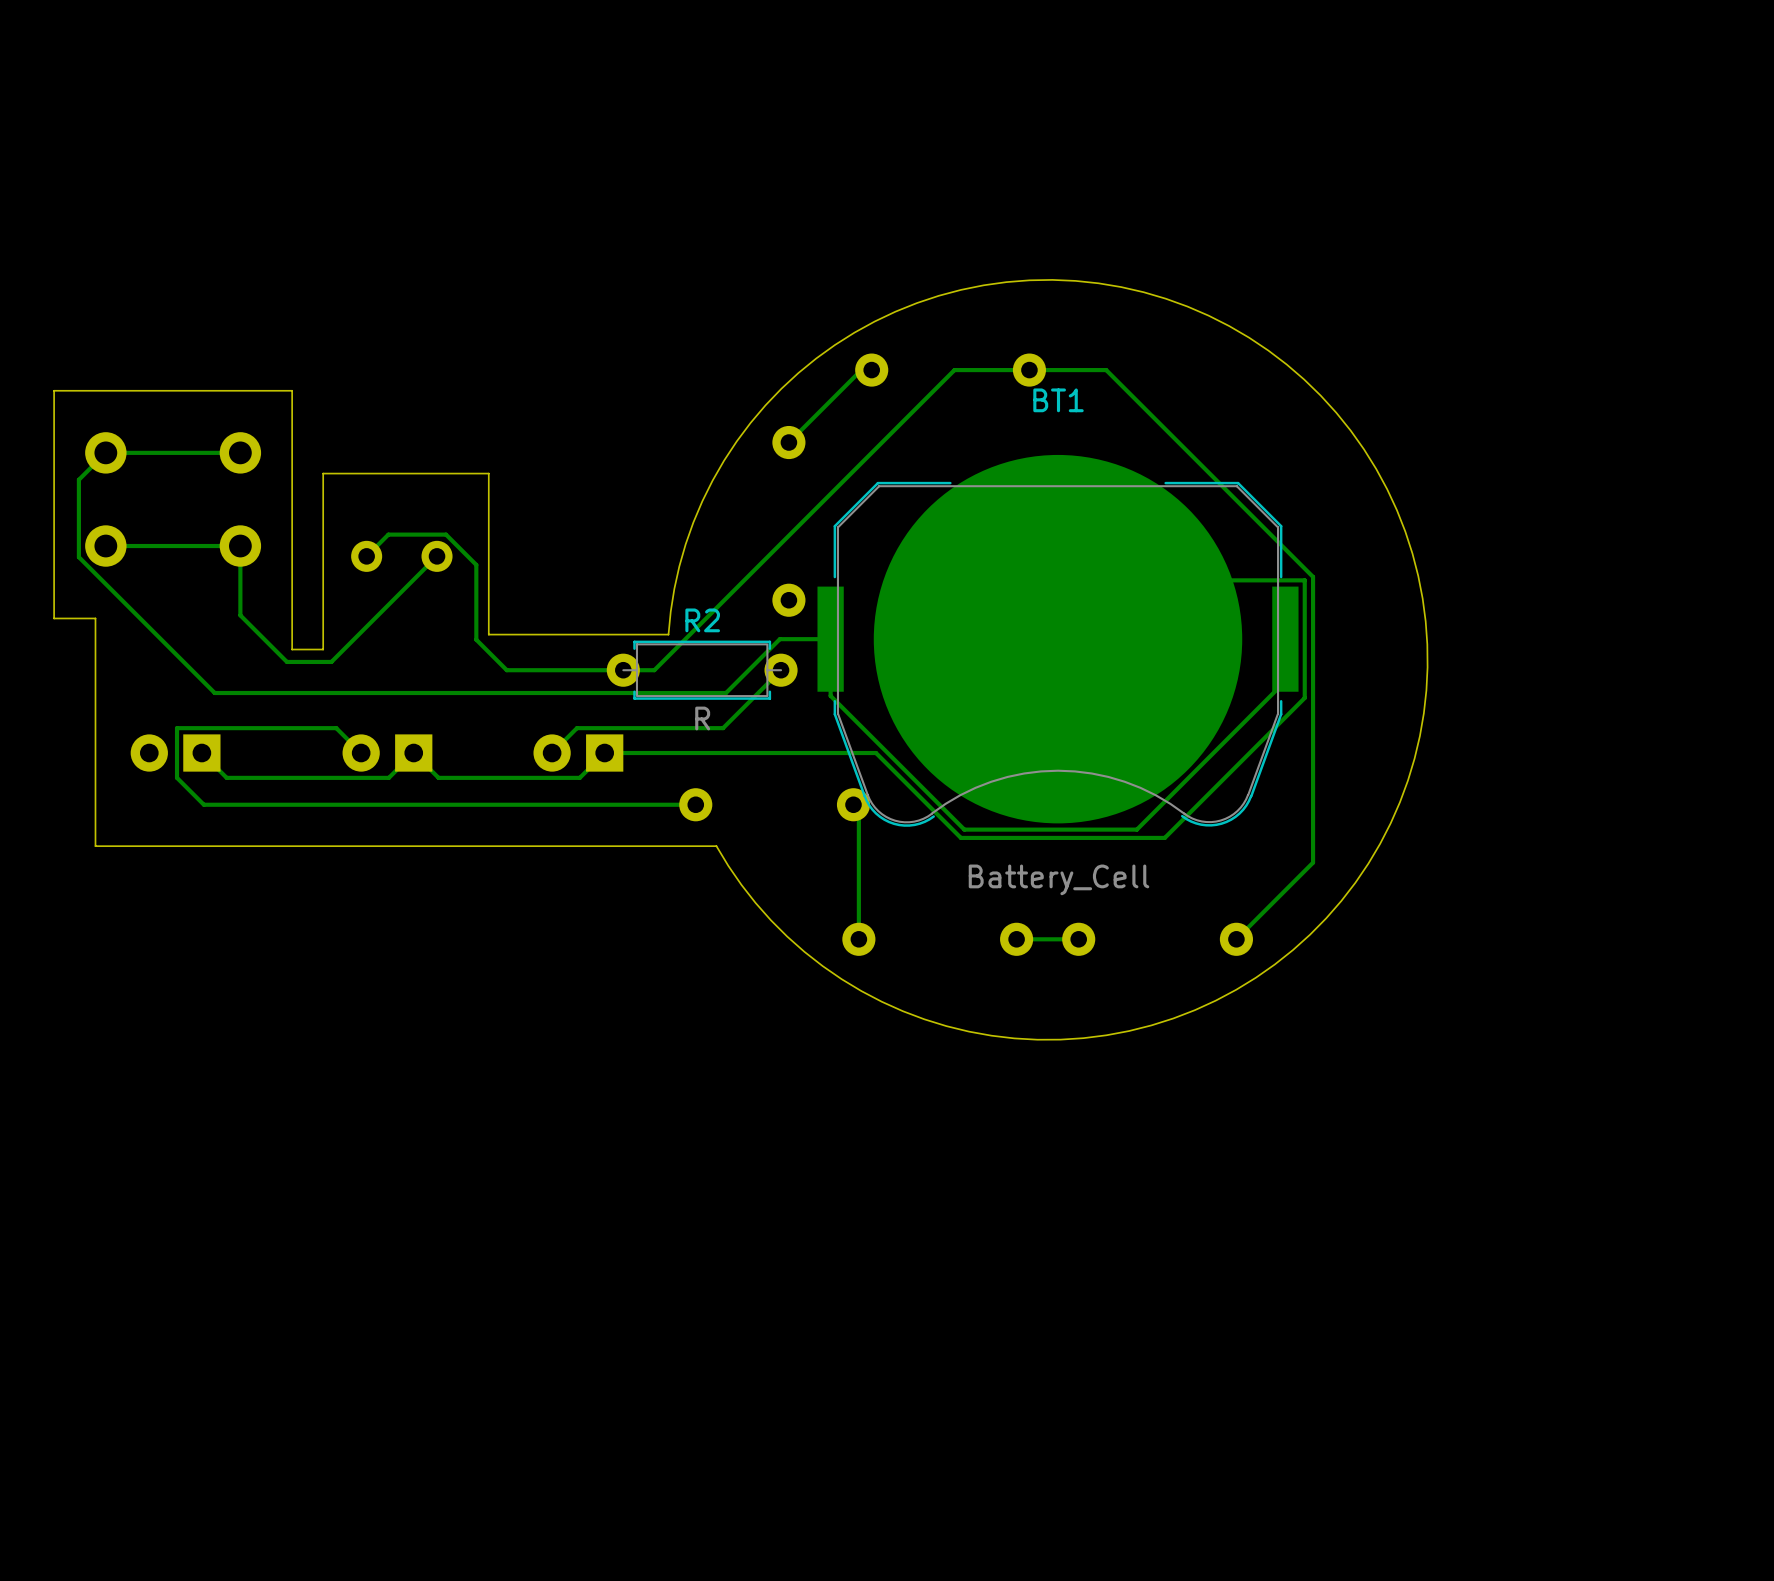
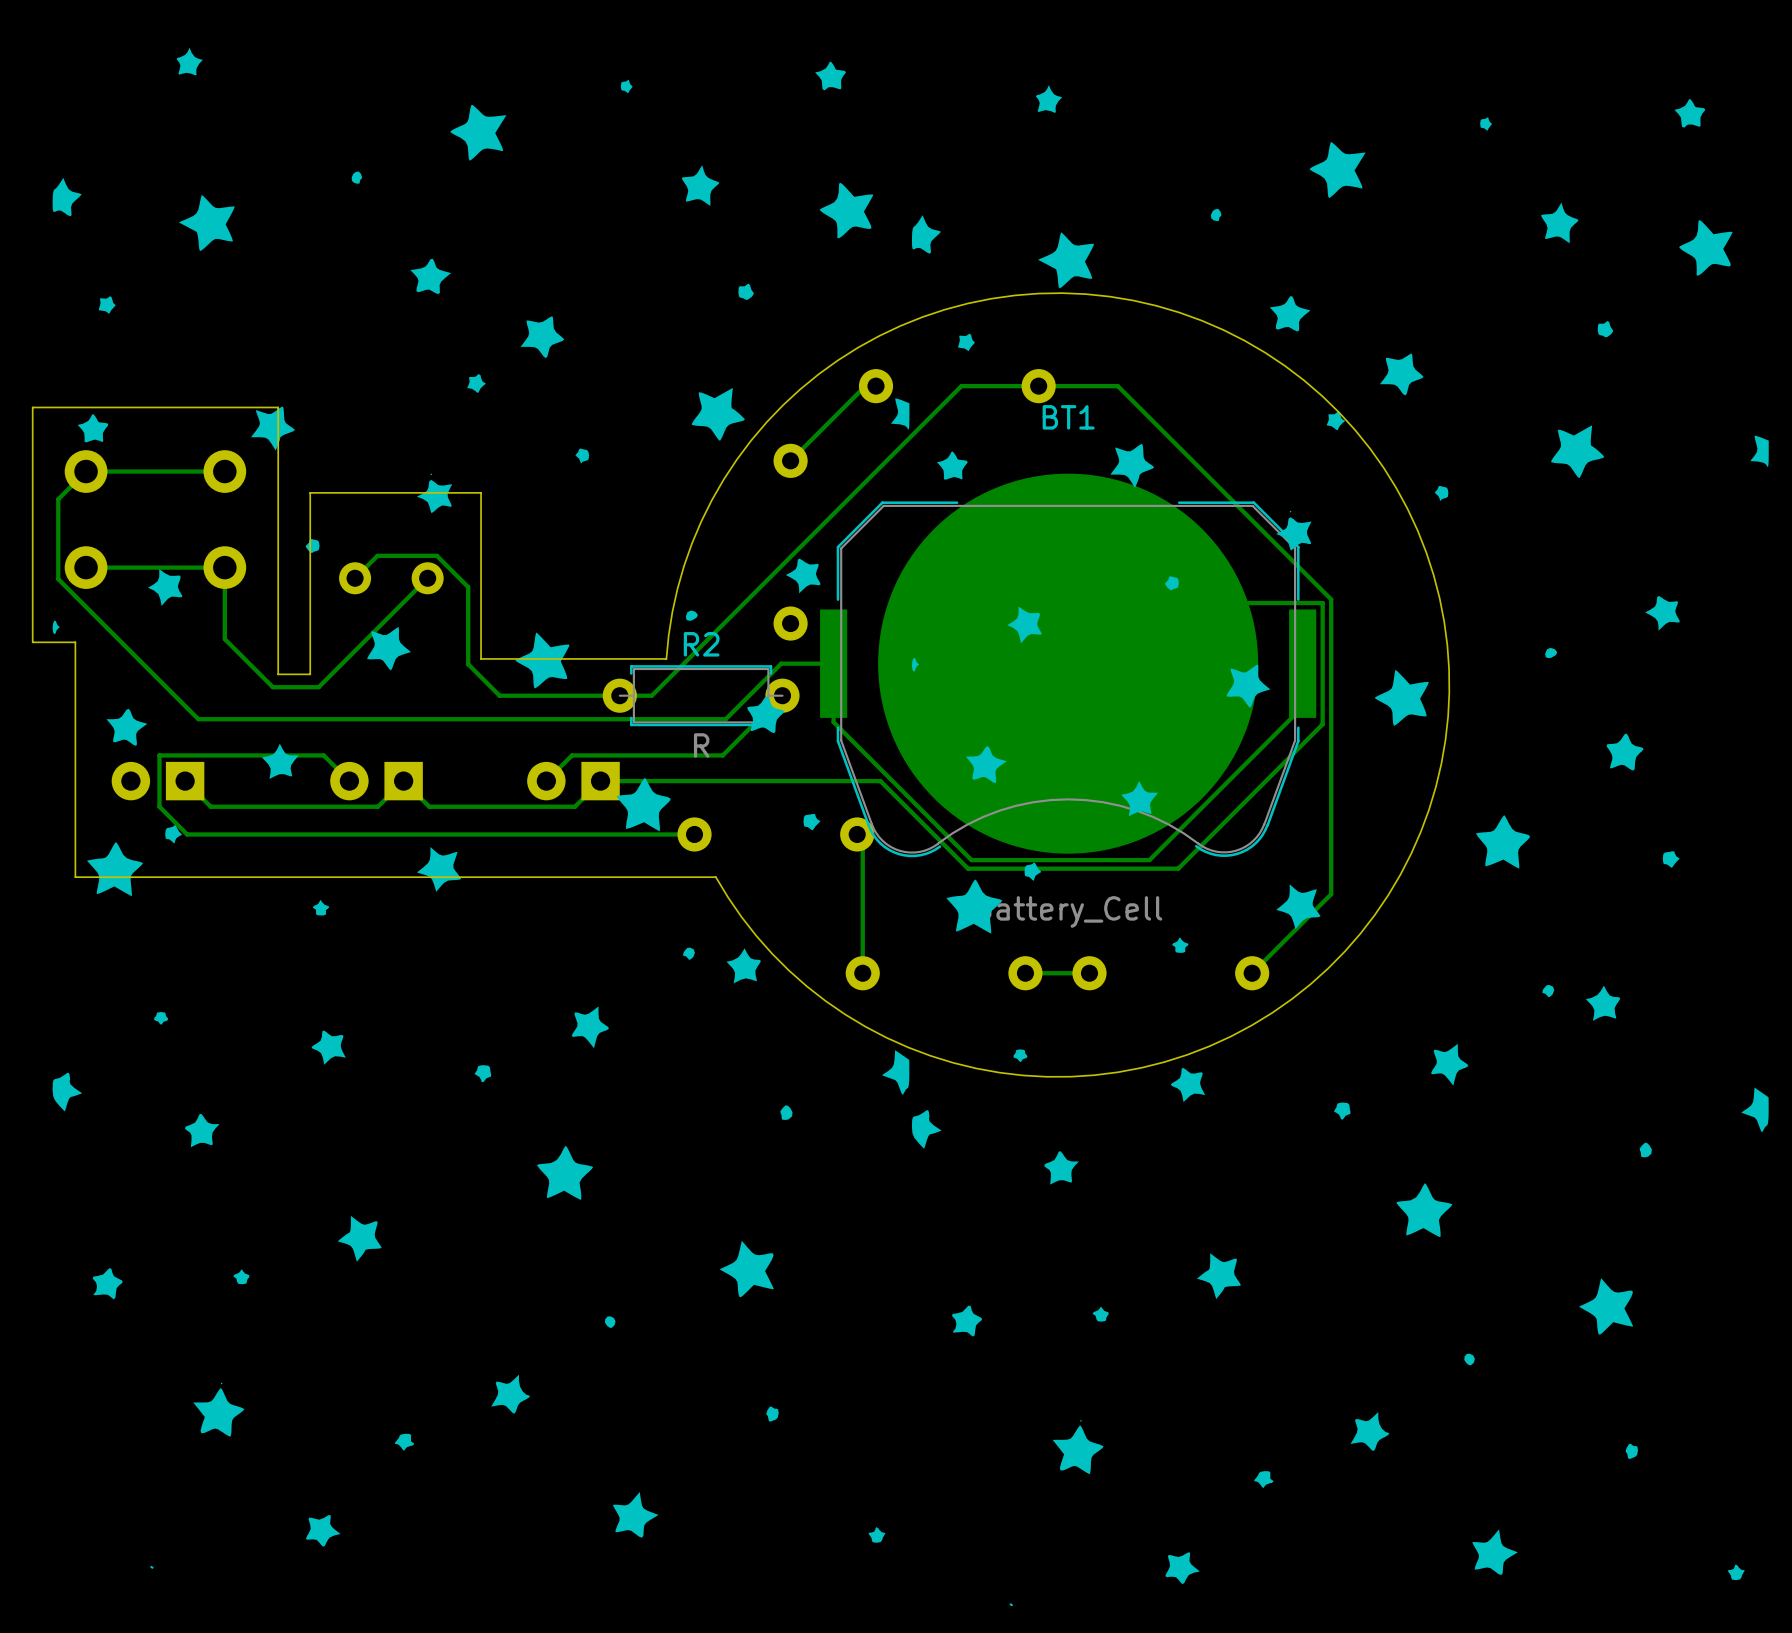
drawing: none -> [52, 47, 1769, 1607]

